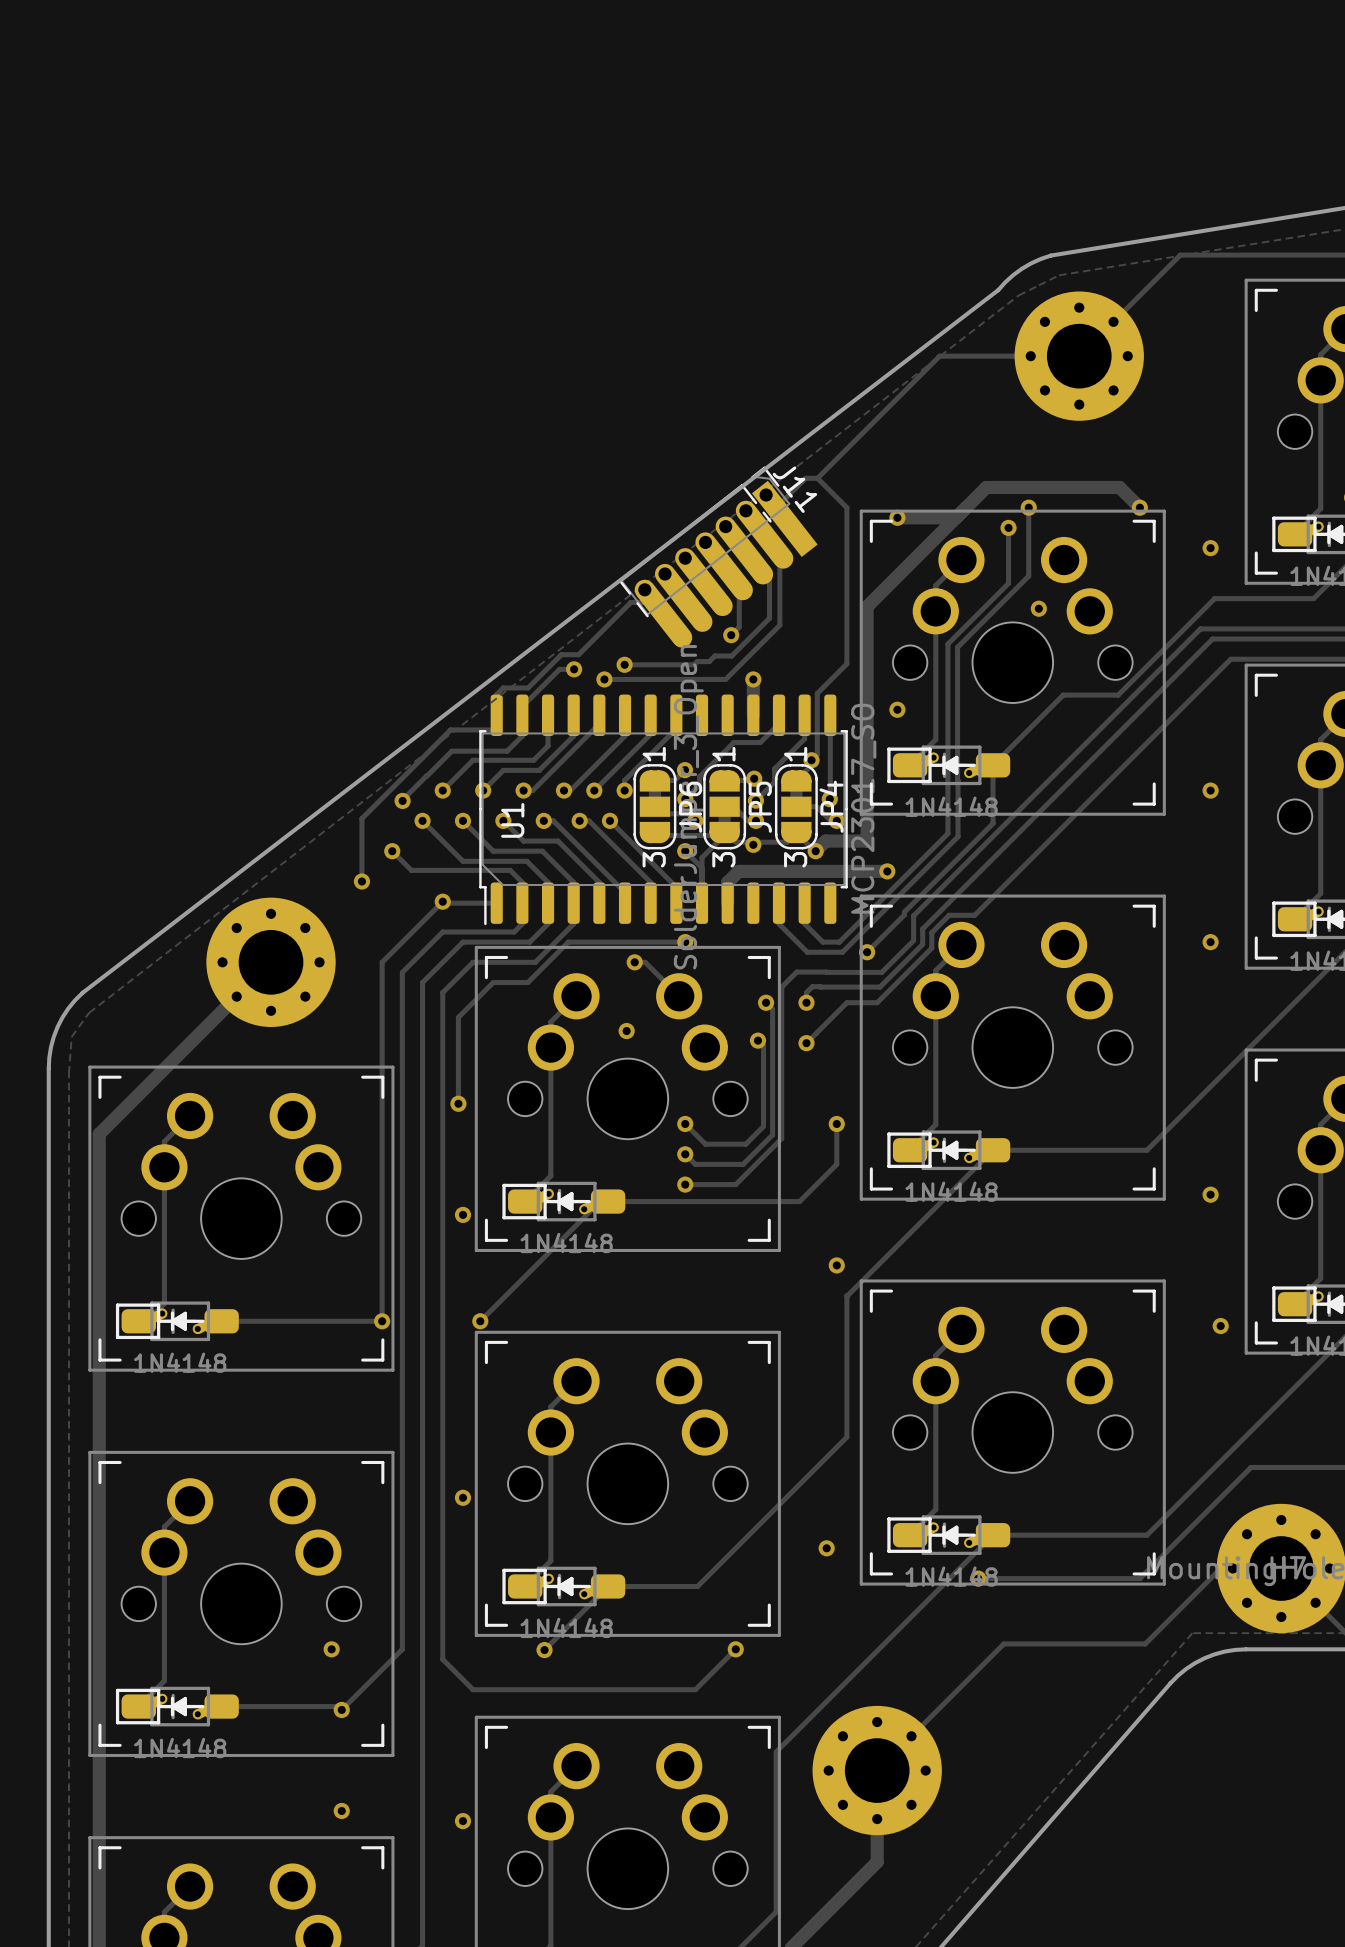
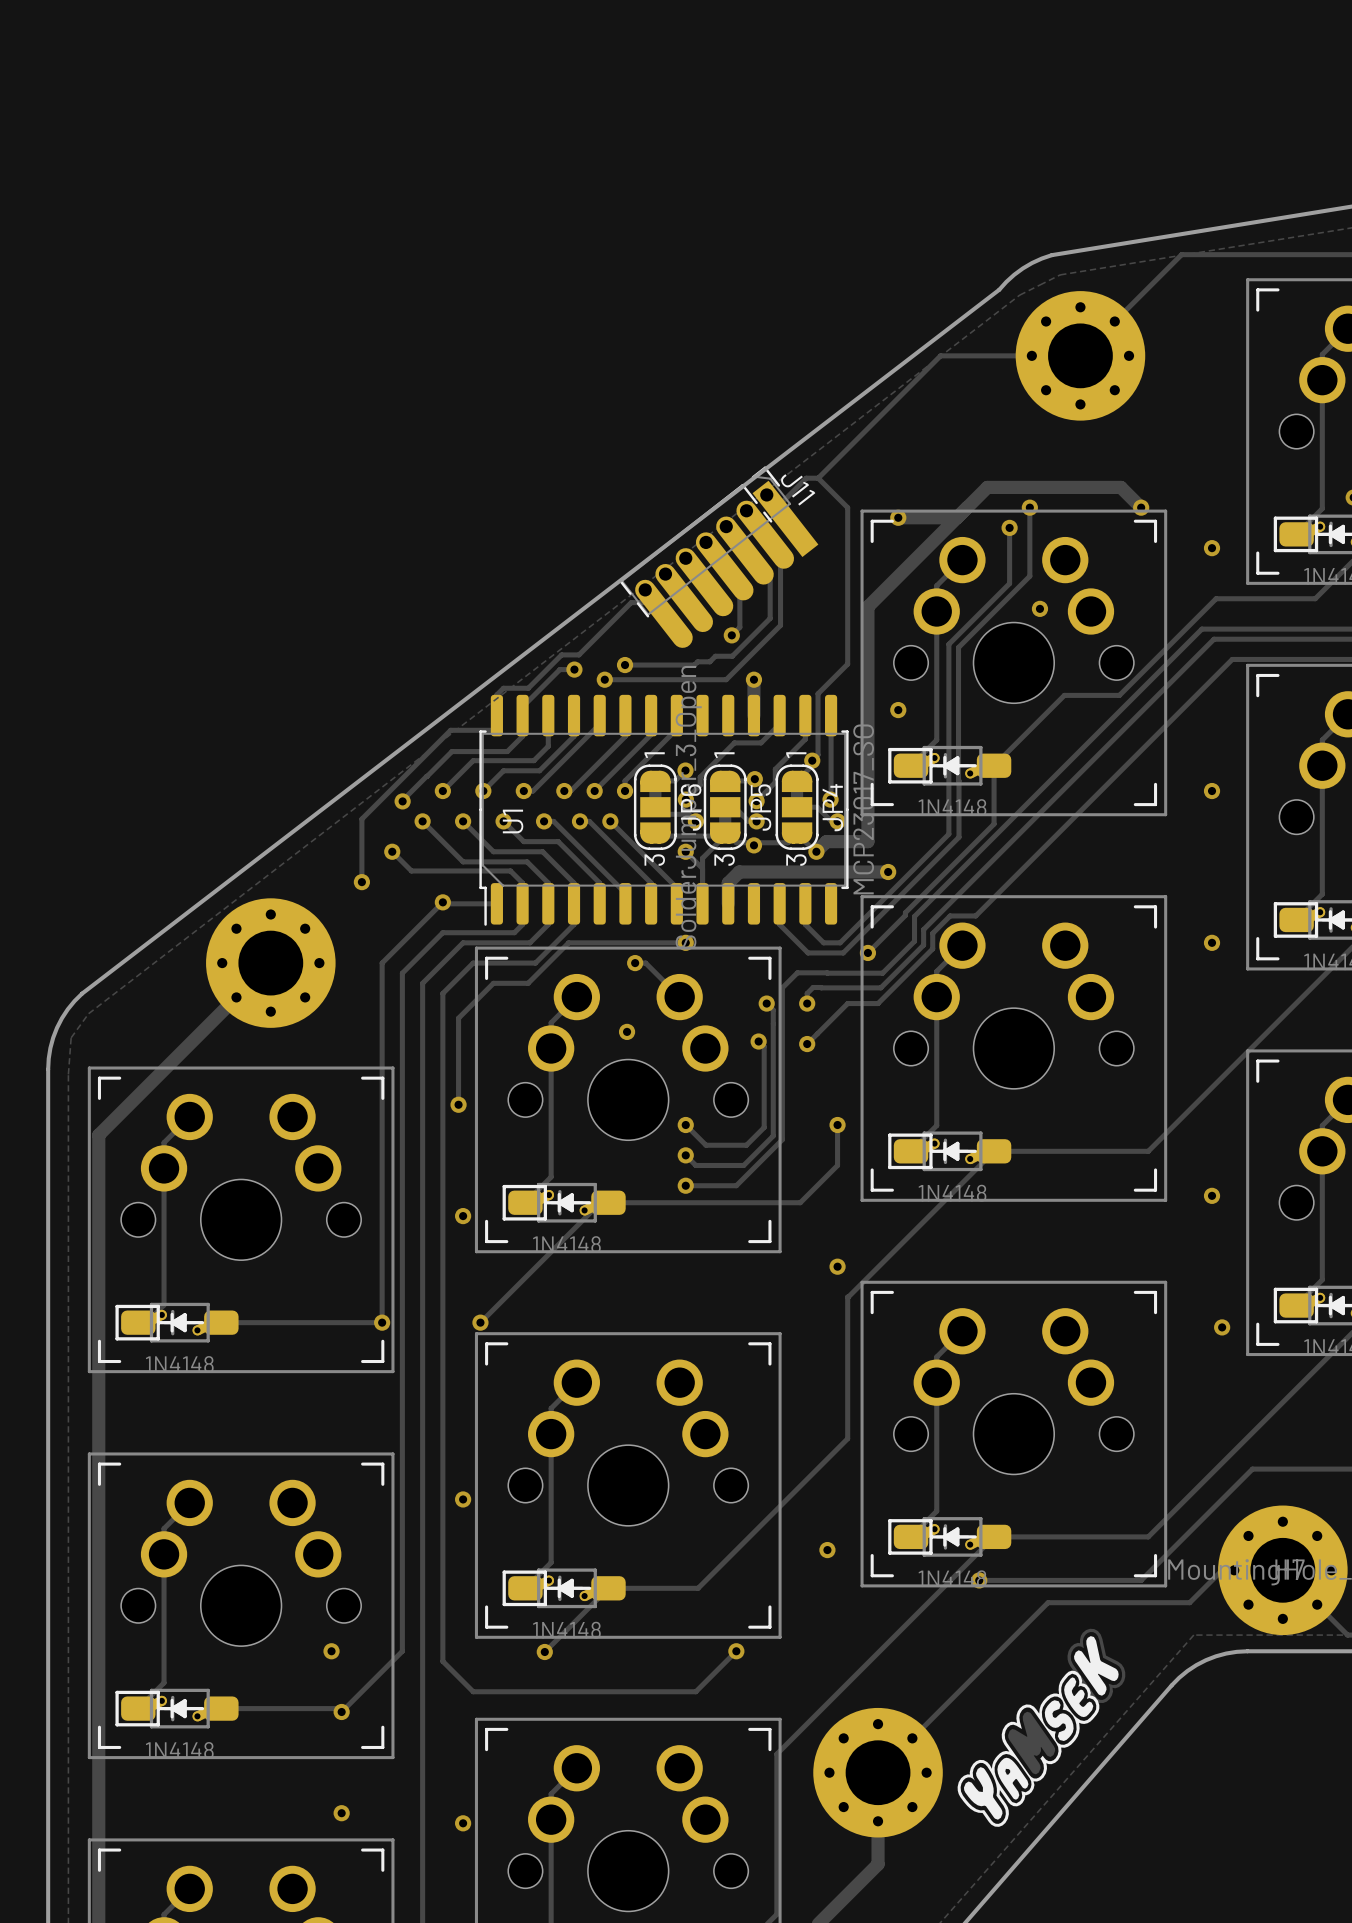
track: (1188, 1600) (1145, 1643) (1003, 1643) -> (1189, 1602) (1048, 1602) (1004, 1645)
drawing: none -> [957, 1628, 1126, 1827]

